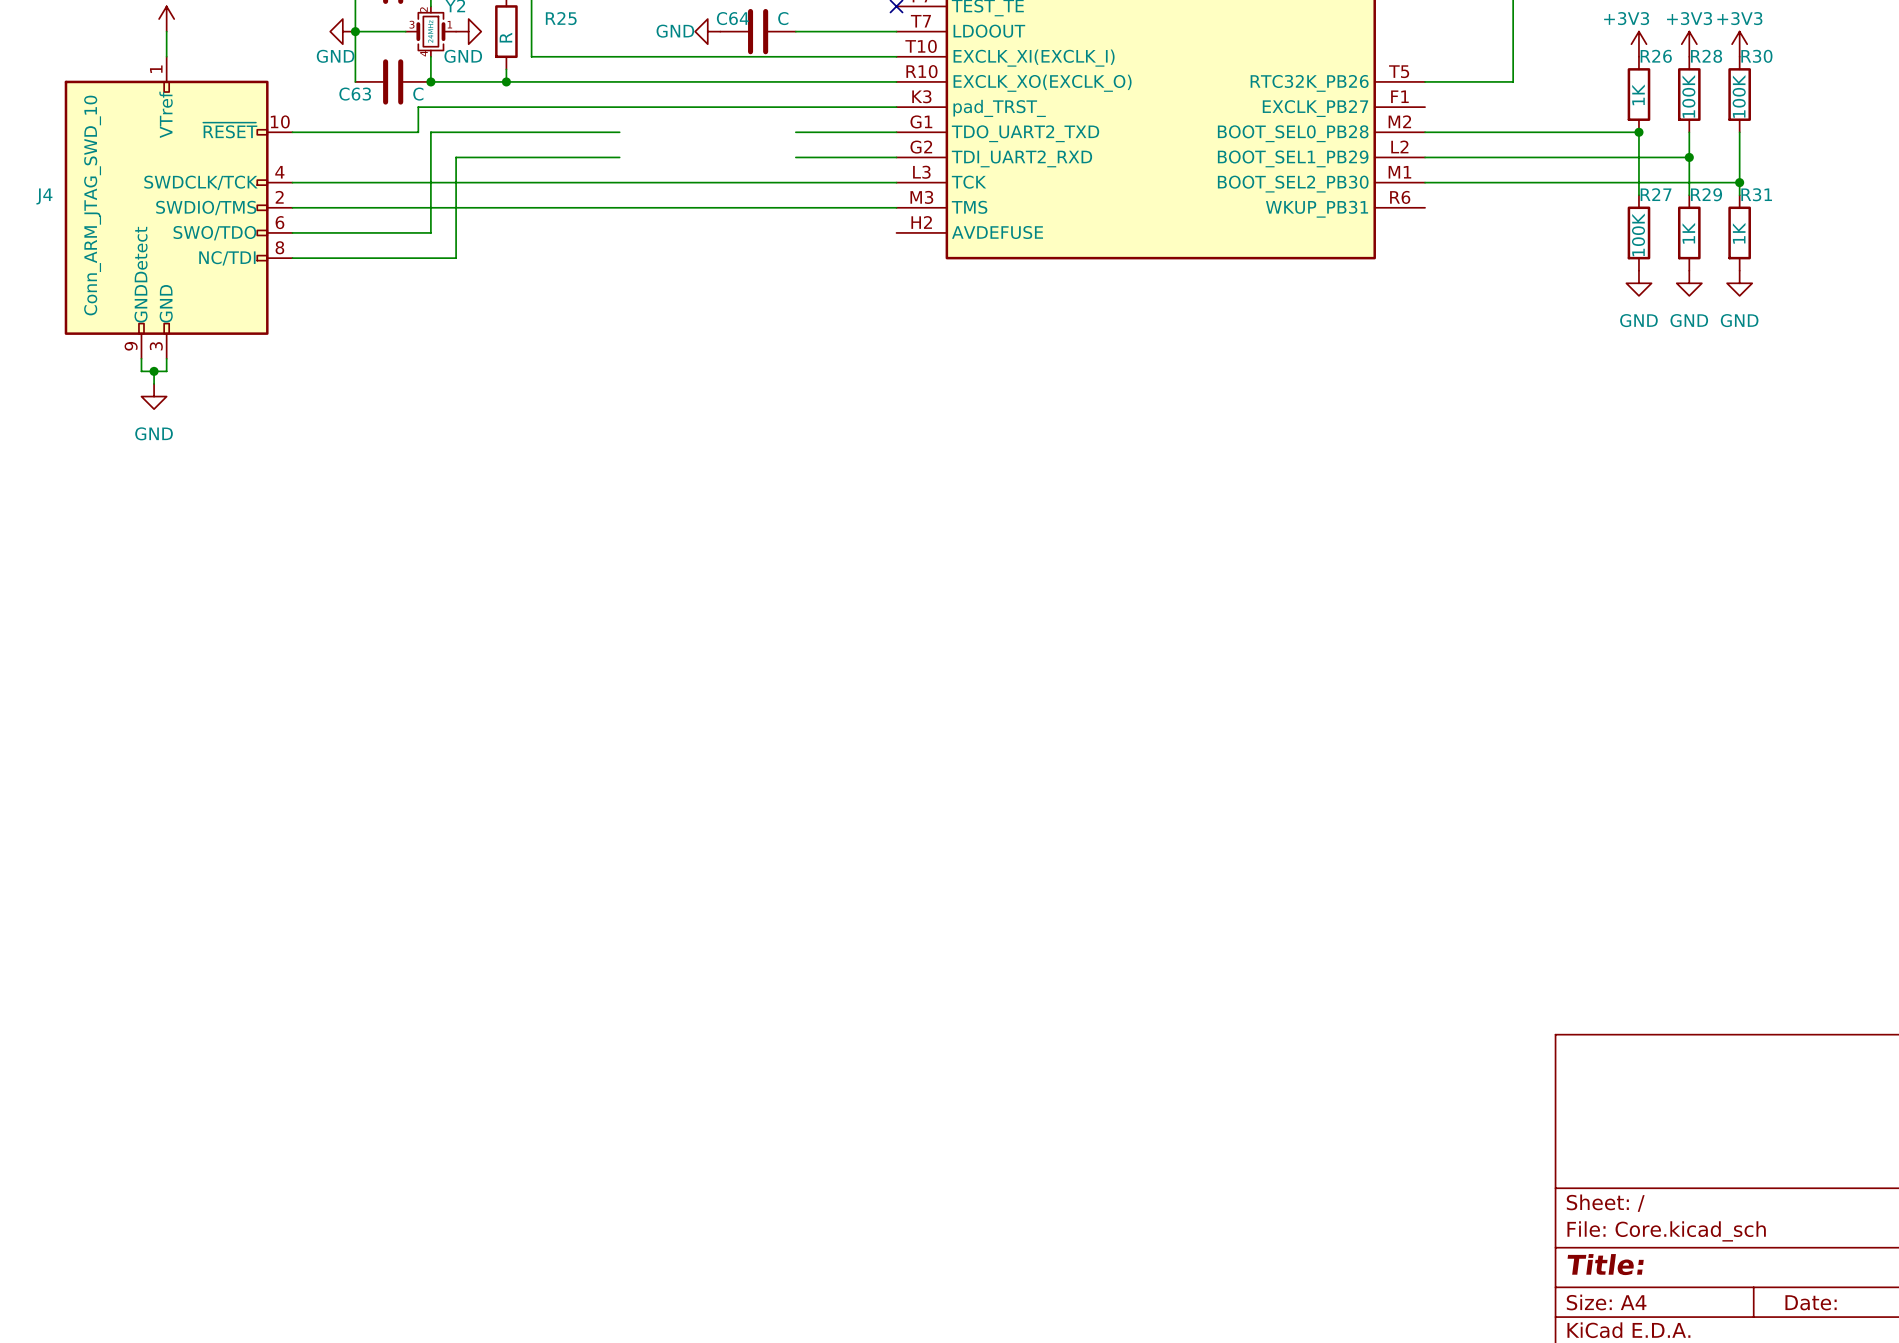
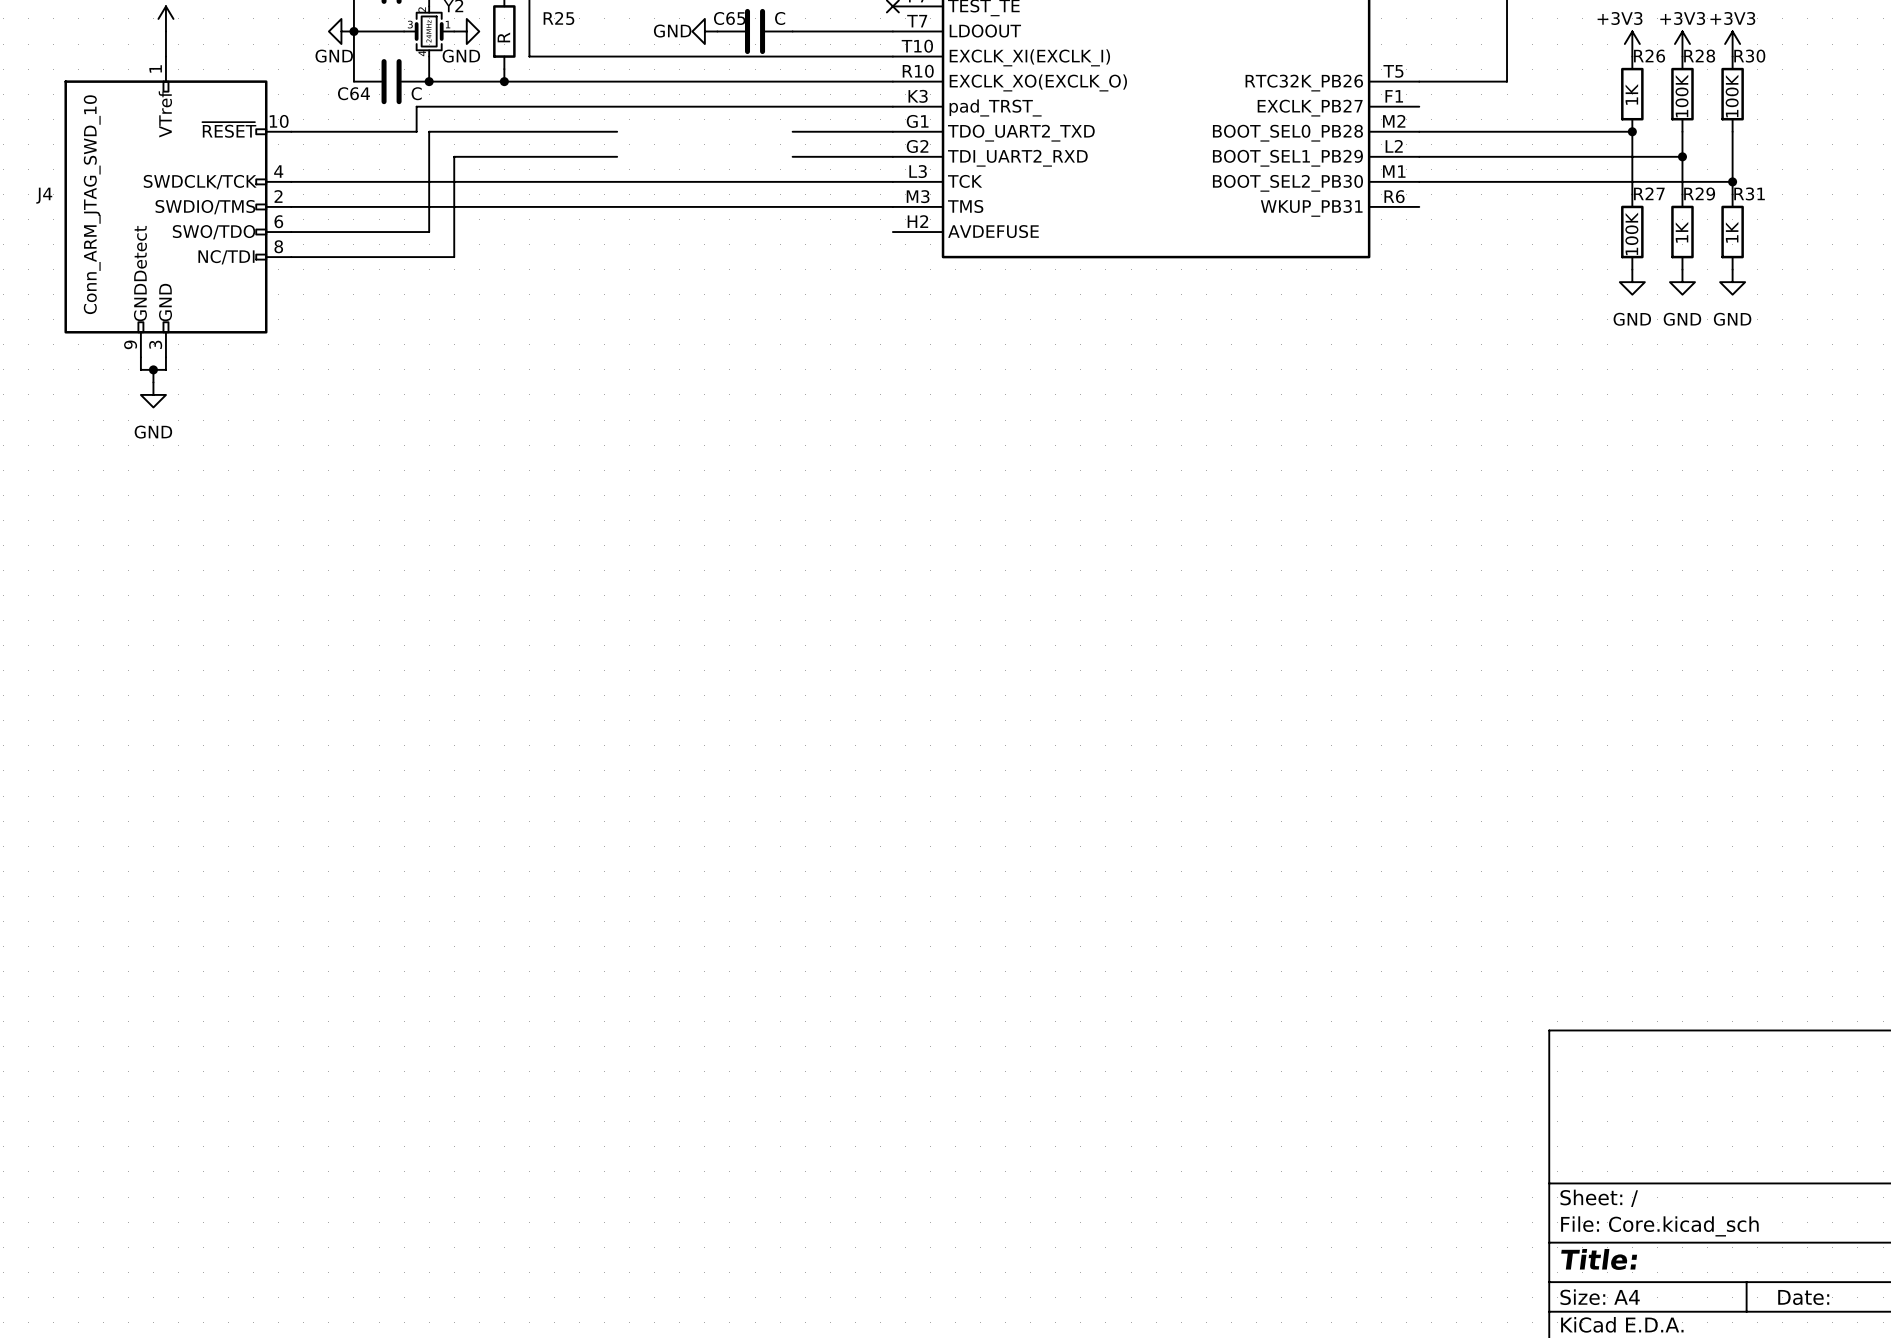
C64 name: C64 (732, 18) -> C65 (729, 18)
C63 name: C63 (355, 94) -> C64 (353, 93)

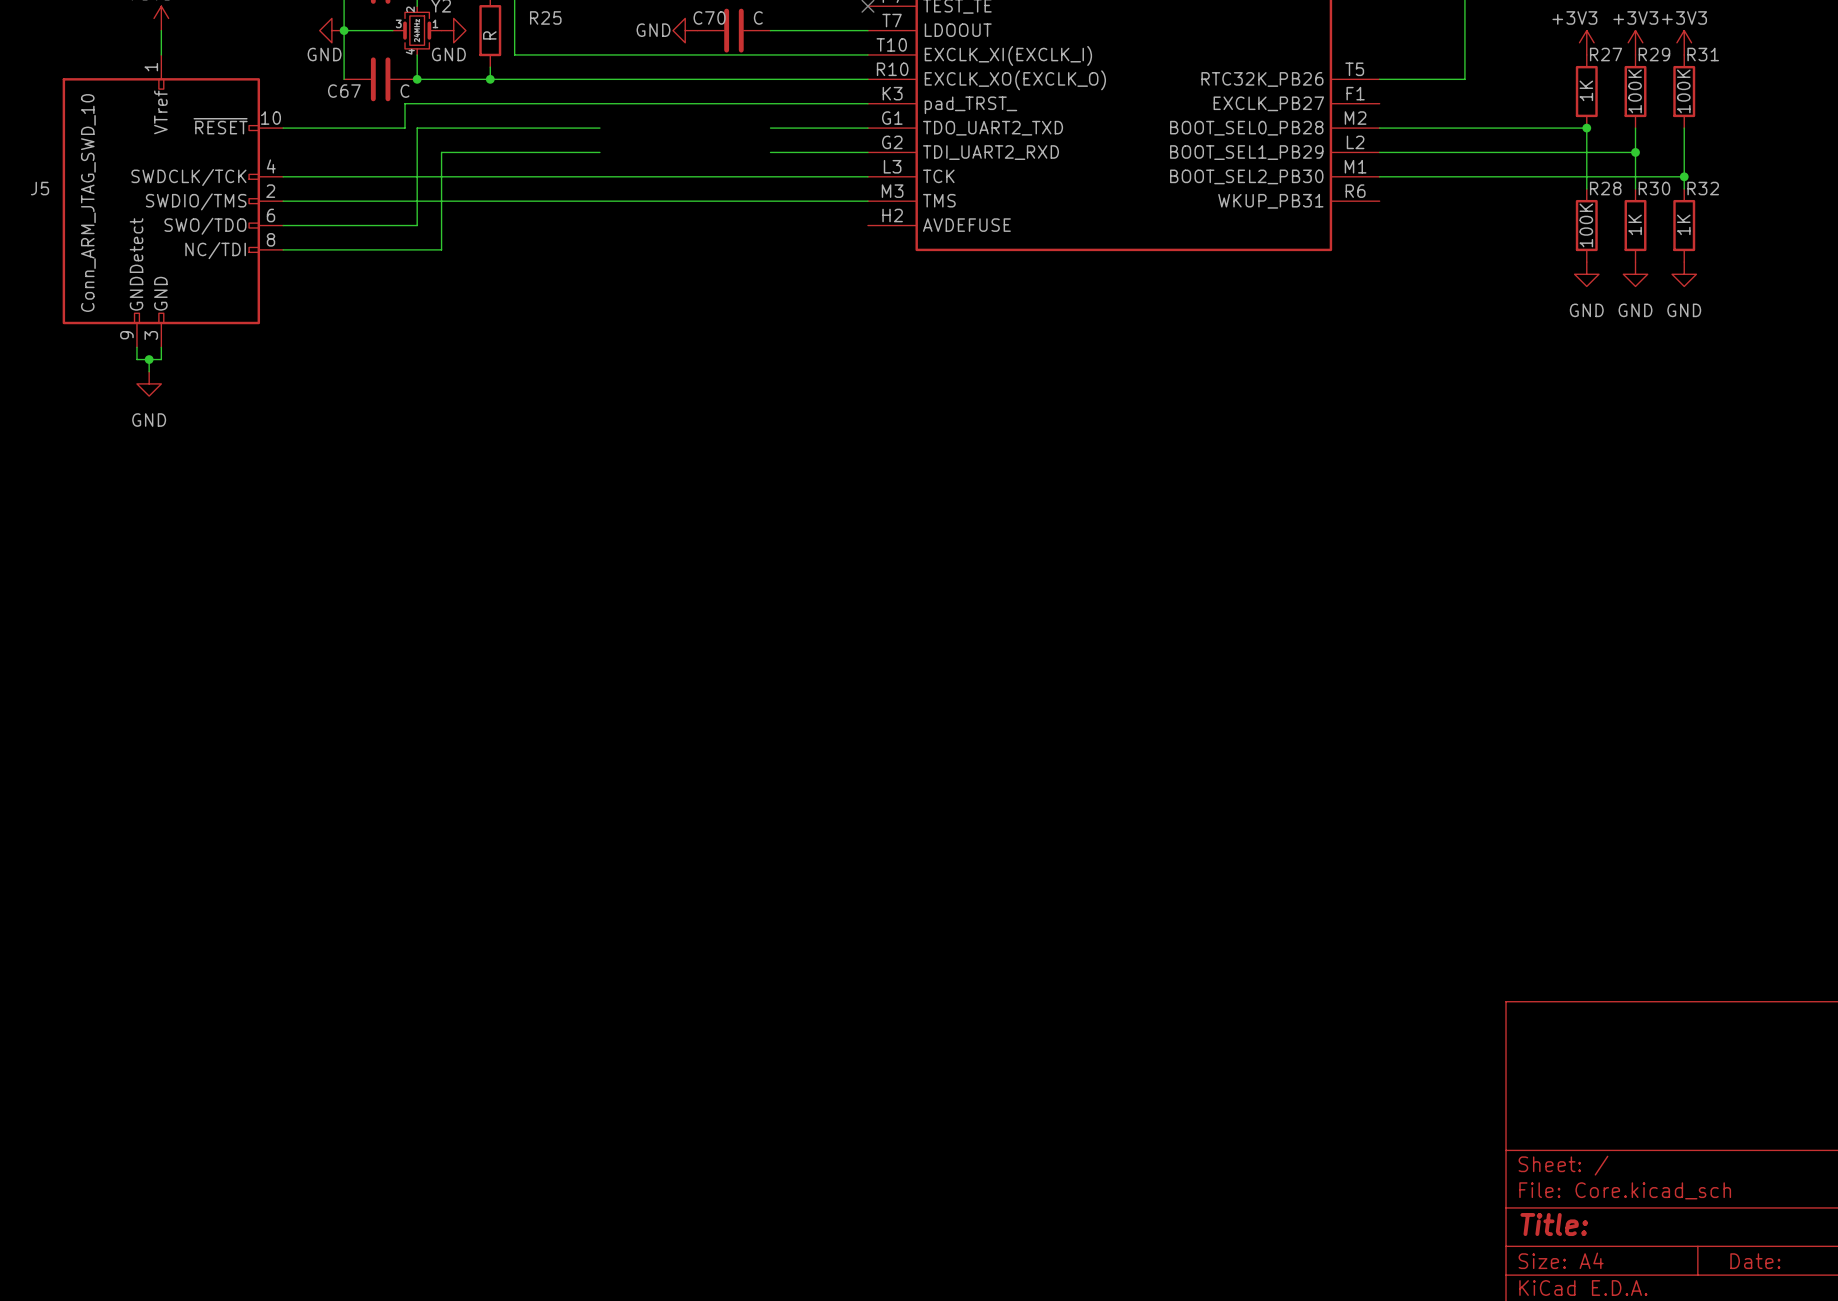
C65 name: C65 (729, 18) -> C70 (709, 17)
R26 name: R26 (1649, 56) -> R27 (1606, 54)
R28 name: R28 (1699, 56) -> R29 (1654, 54)
R30 name: R30 (1749, 56) -> R31 (1703, 54)
C64 name: C64 (353, 93) -> C67 (344, 91)
R27 name: R27 (1649, 193) -> R28 (1605, 188)
R29 name: R29 (1699, 193) -> R30 (1654, 188)
R31 name: R31 (1749, 193) -> R32 (1703, 188)
J4 name: J4 (44, 195) -> J5 (40, 188)

